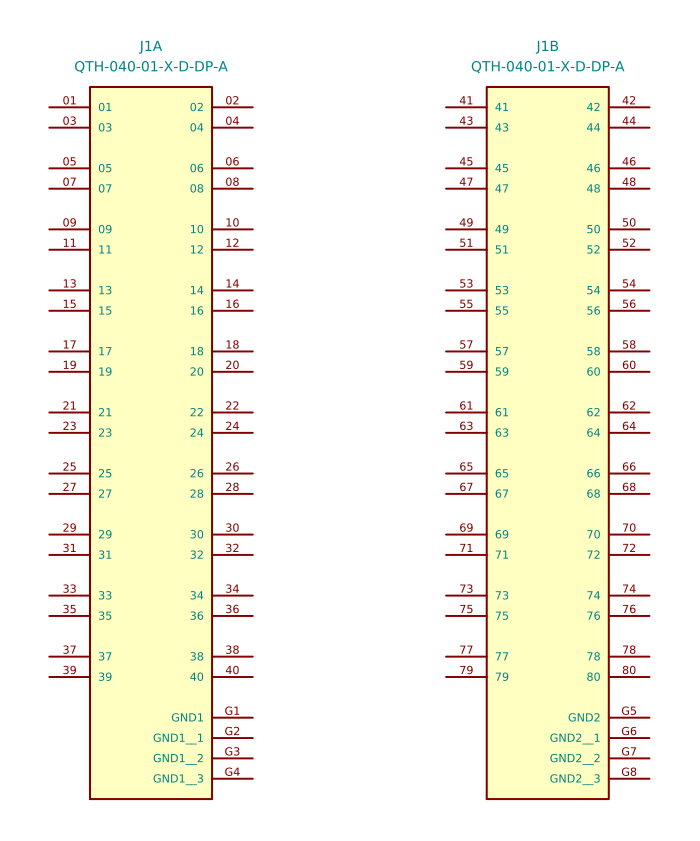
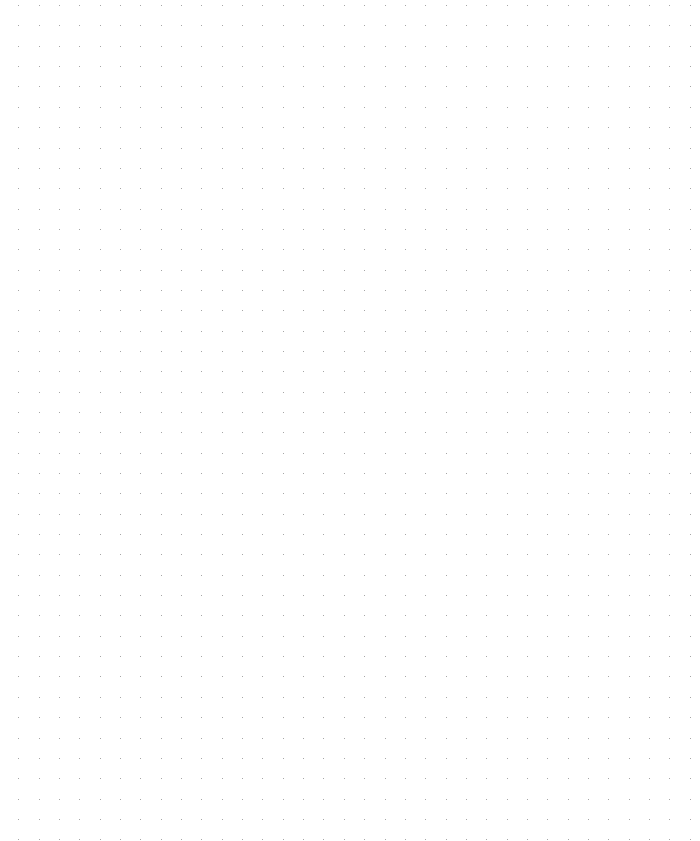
J1A: QTH-040-01-X-D-DP-A (151, 443) -> none
J1B: QTH-040-01-X-D-DP-A (547, 443) -> none

